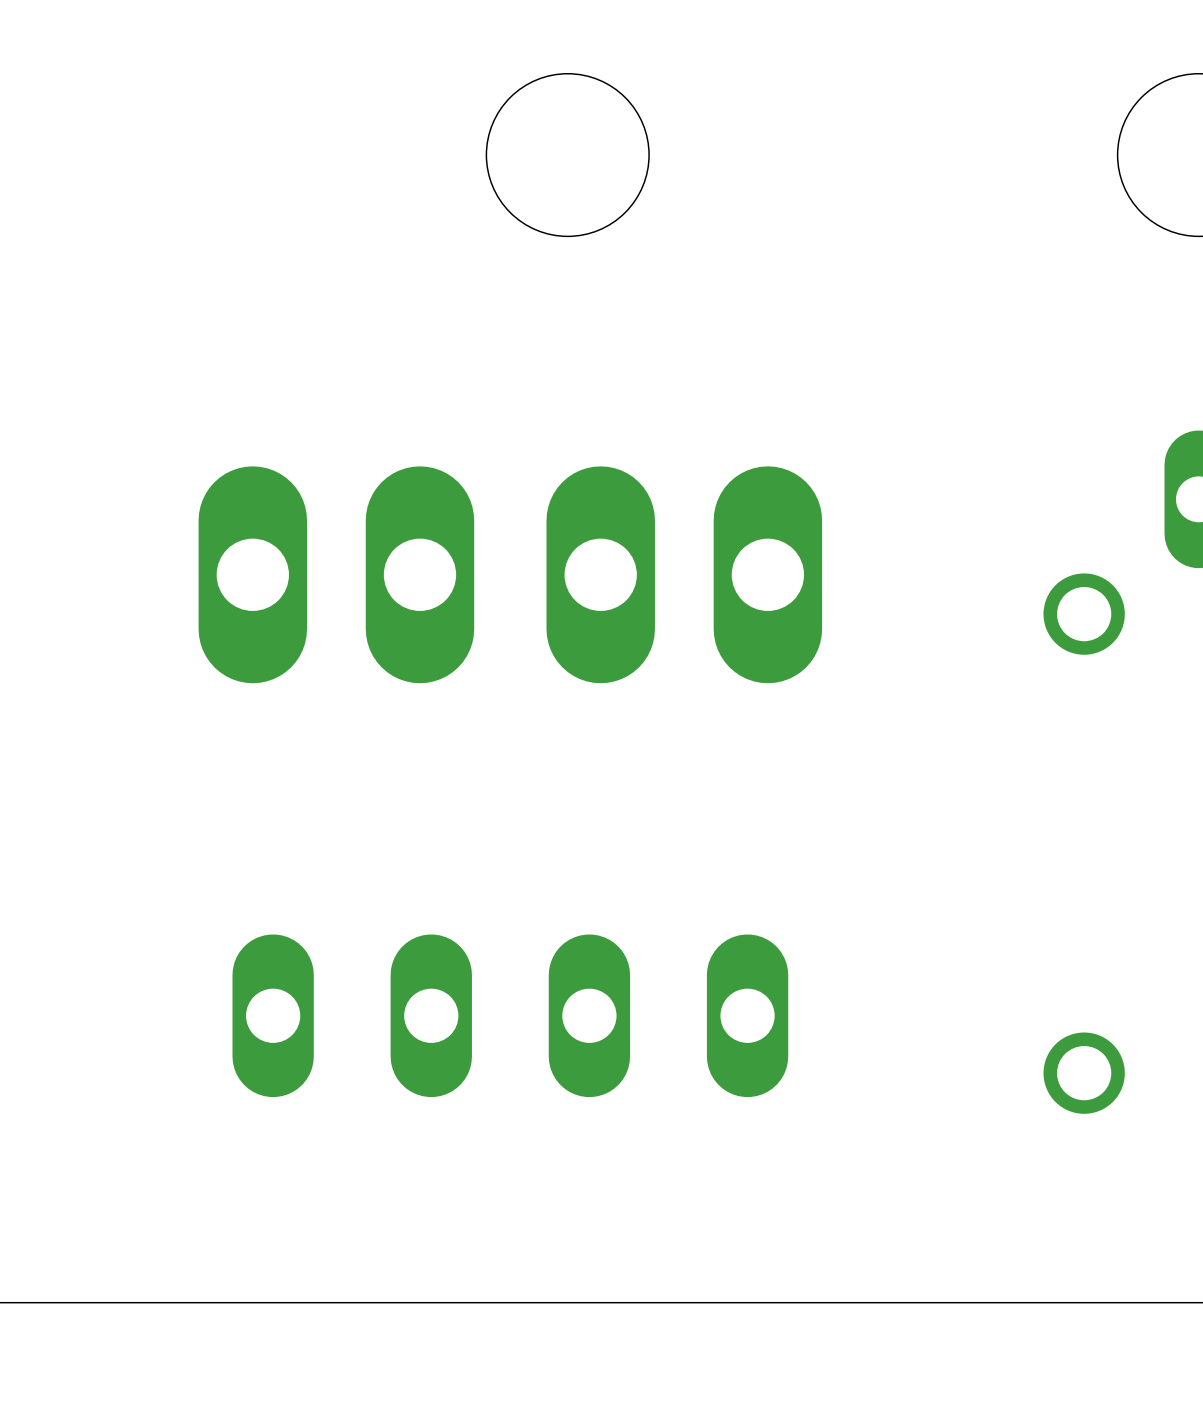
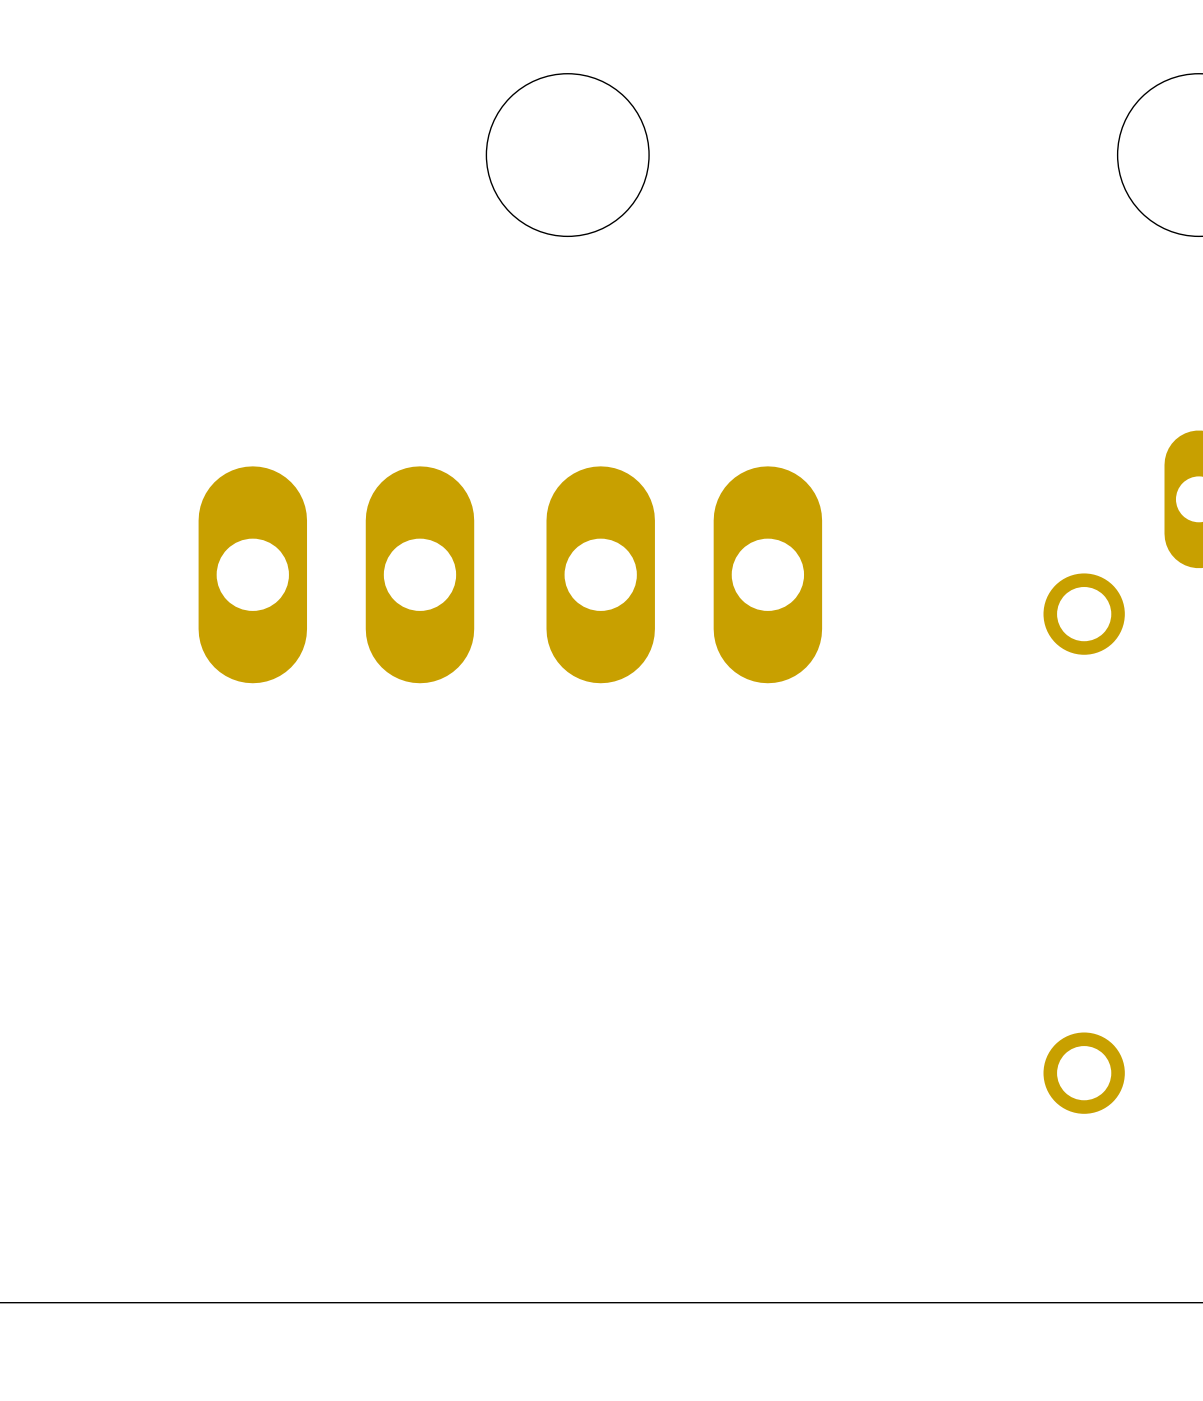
part: (510, 1015) -> none

